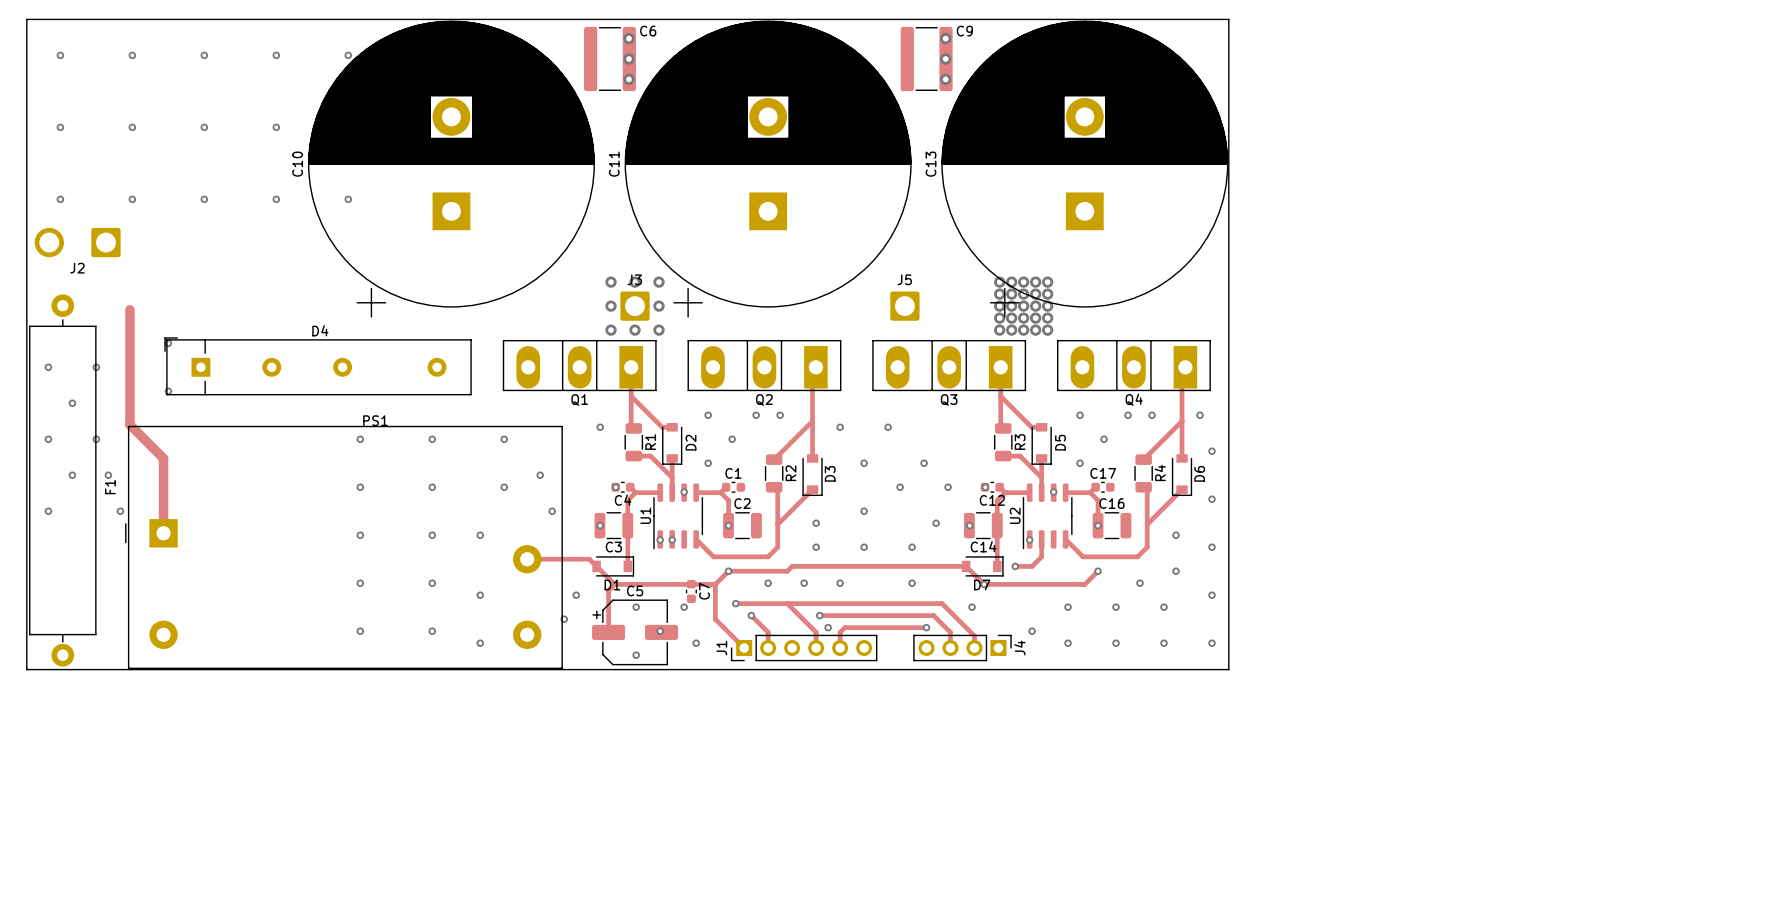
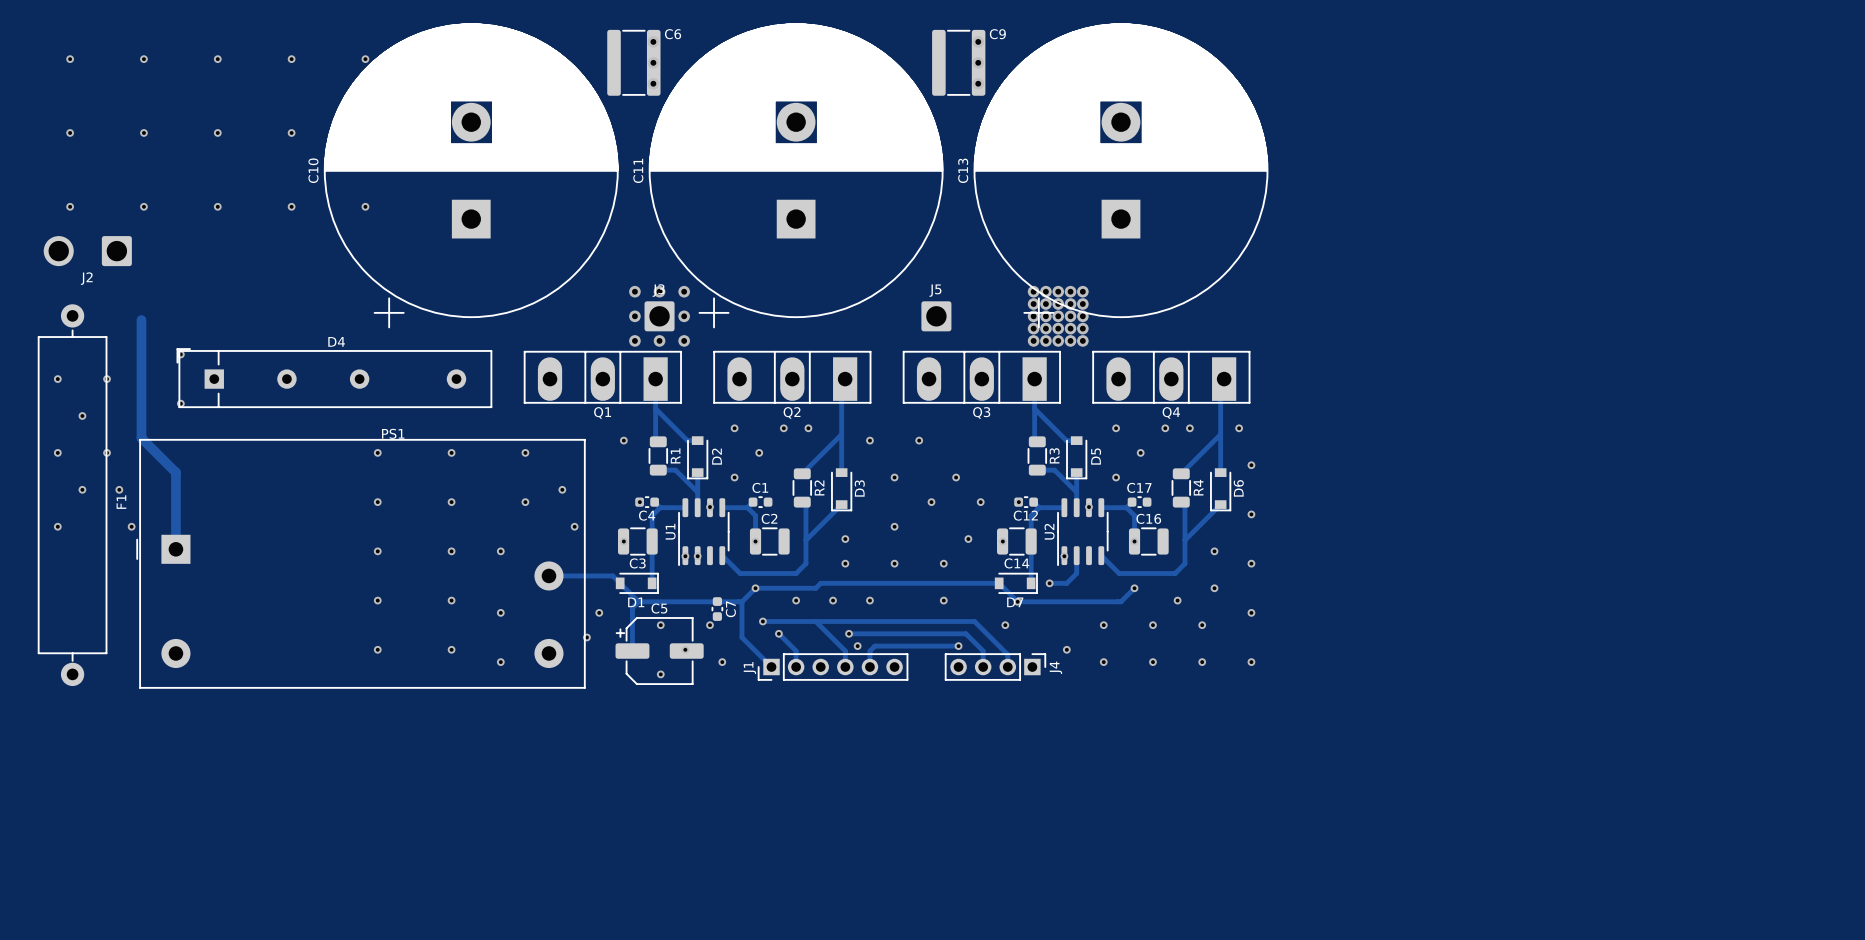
board edge: (26, 19) (26, 669) (1228, 669) (1228, 19) (26, 19) -> none

